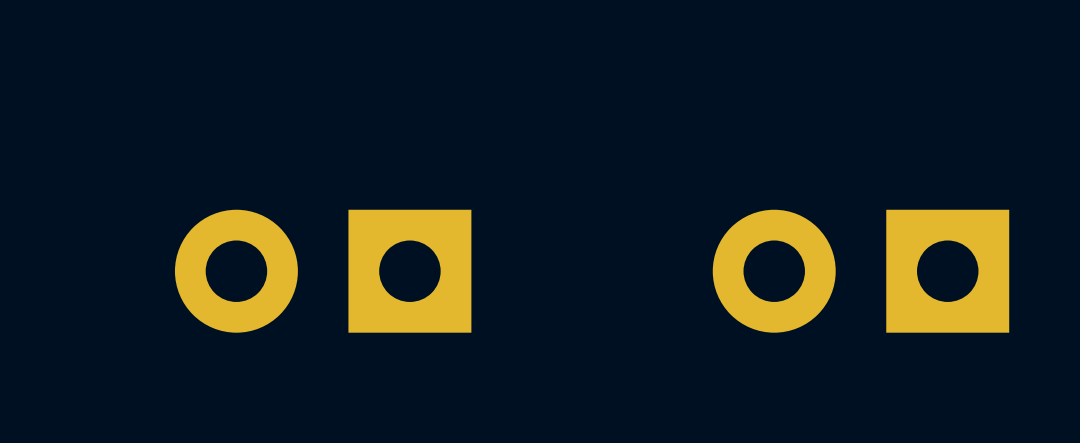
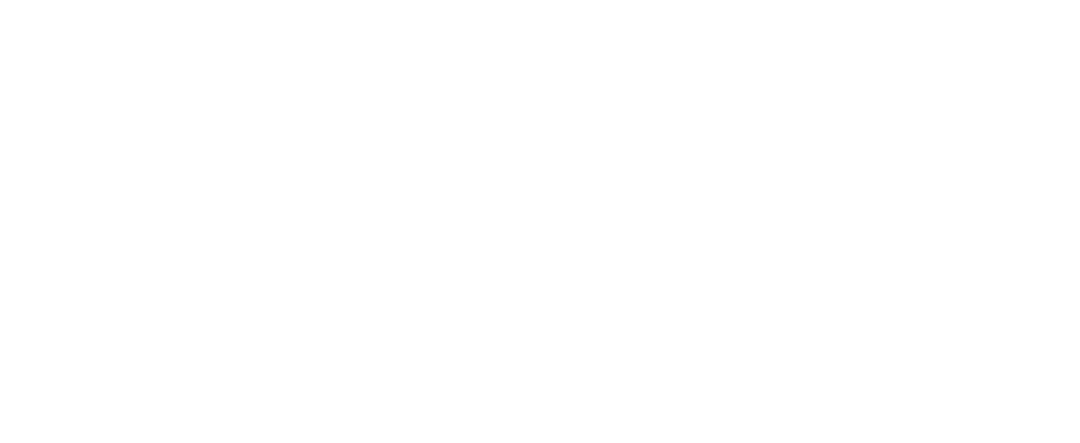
part: (323, 271) -> none
part: (860, 271) -> none

